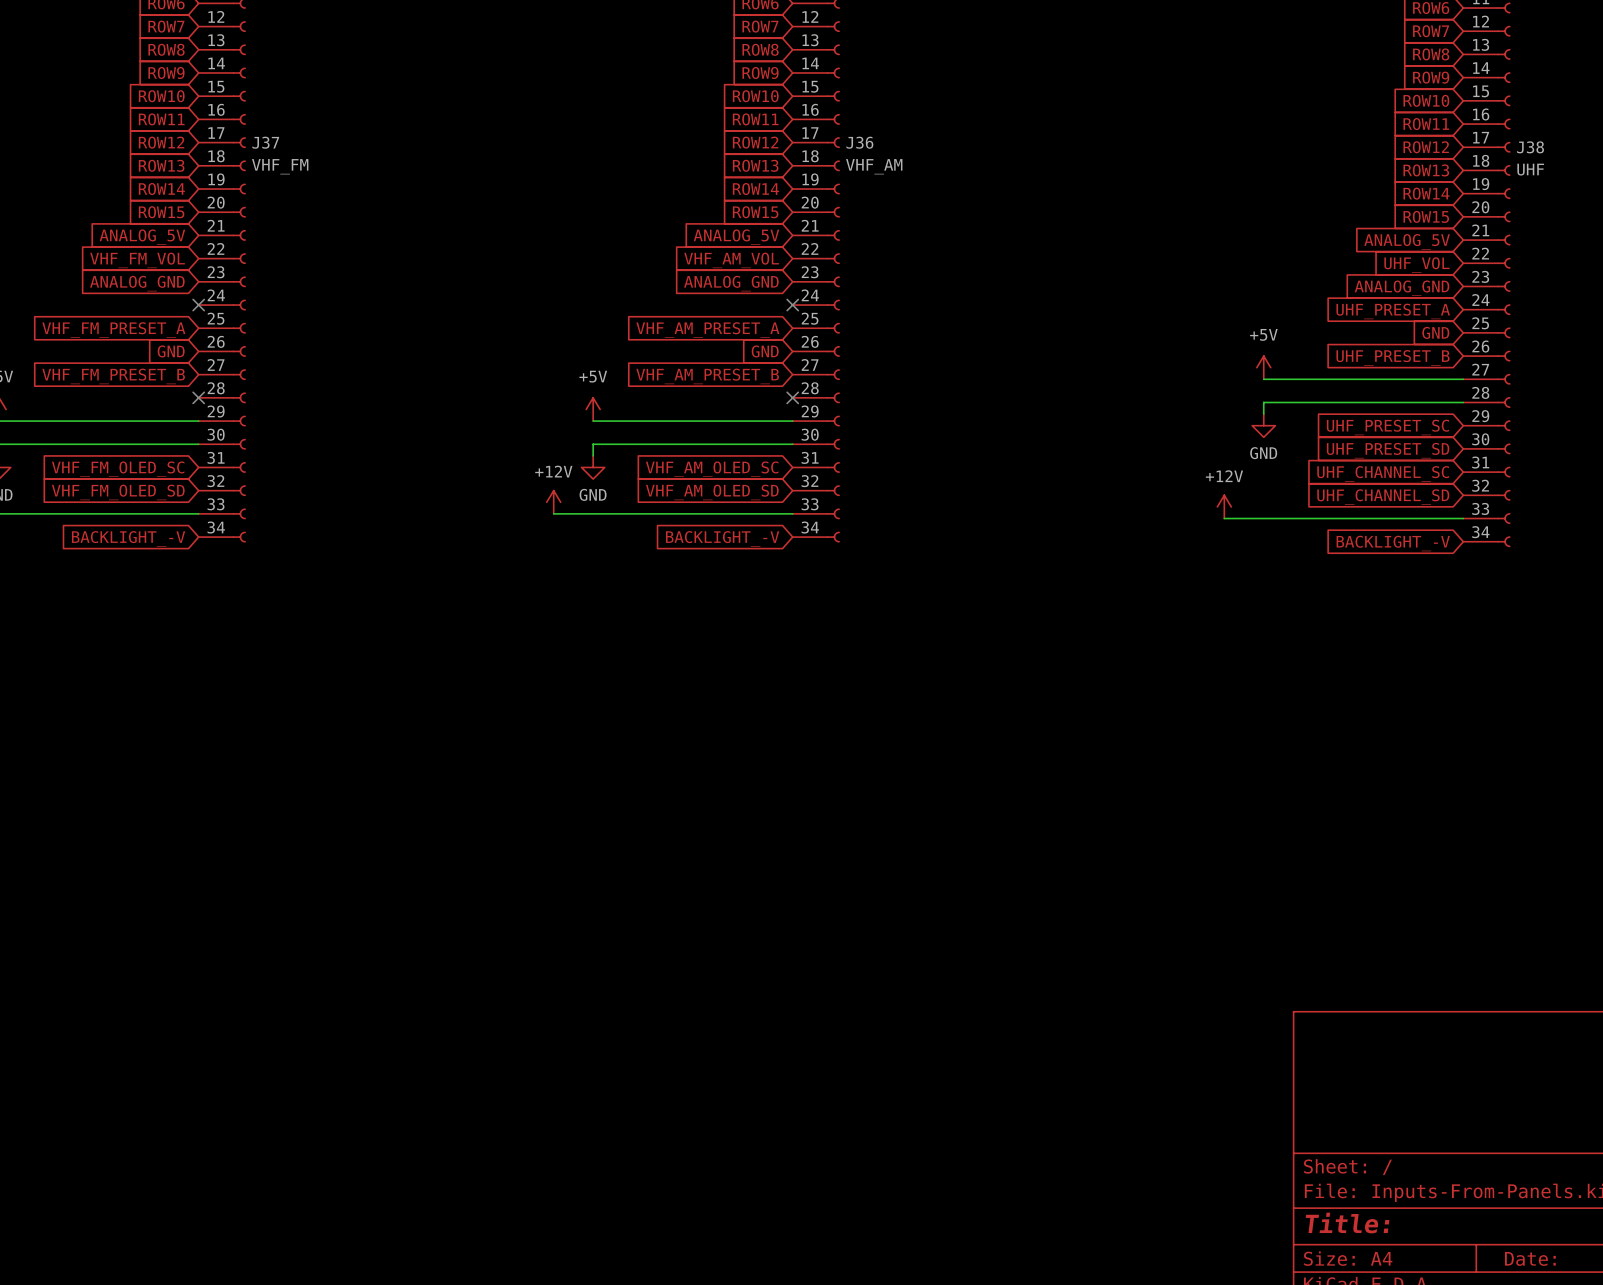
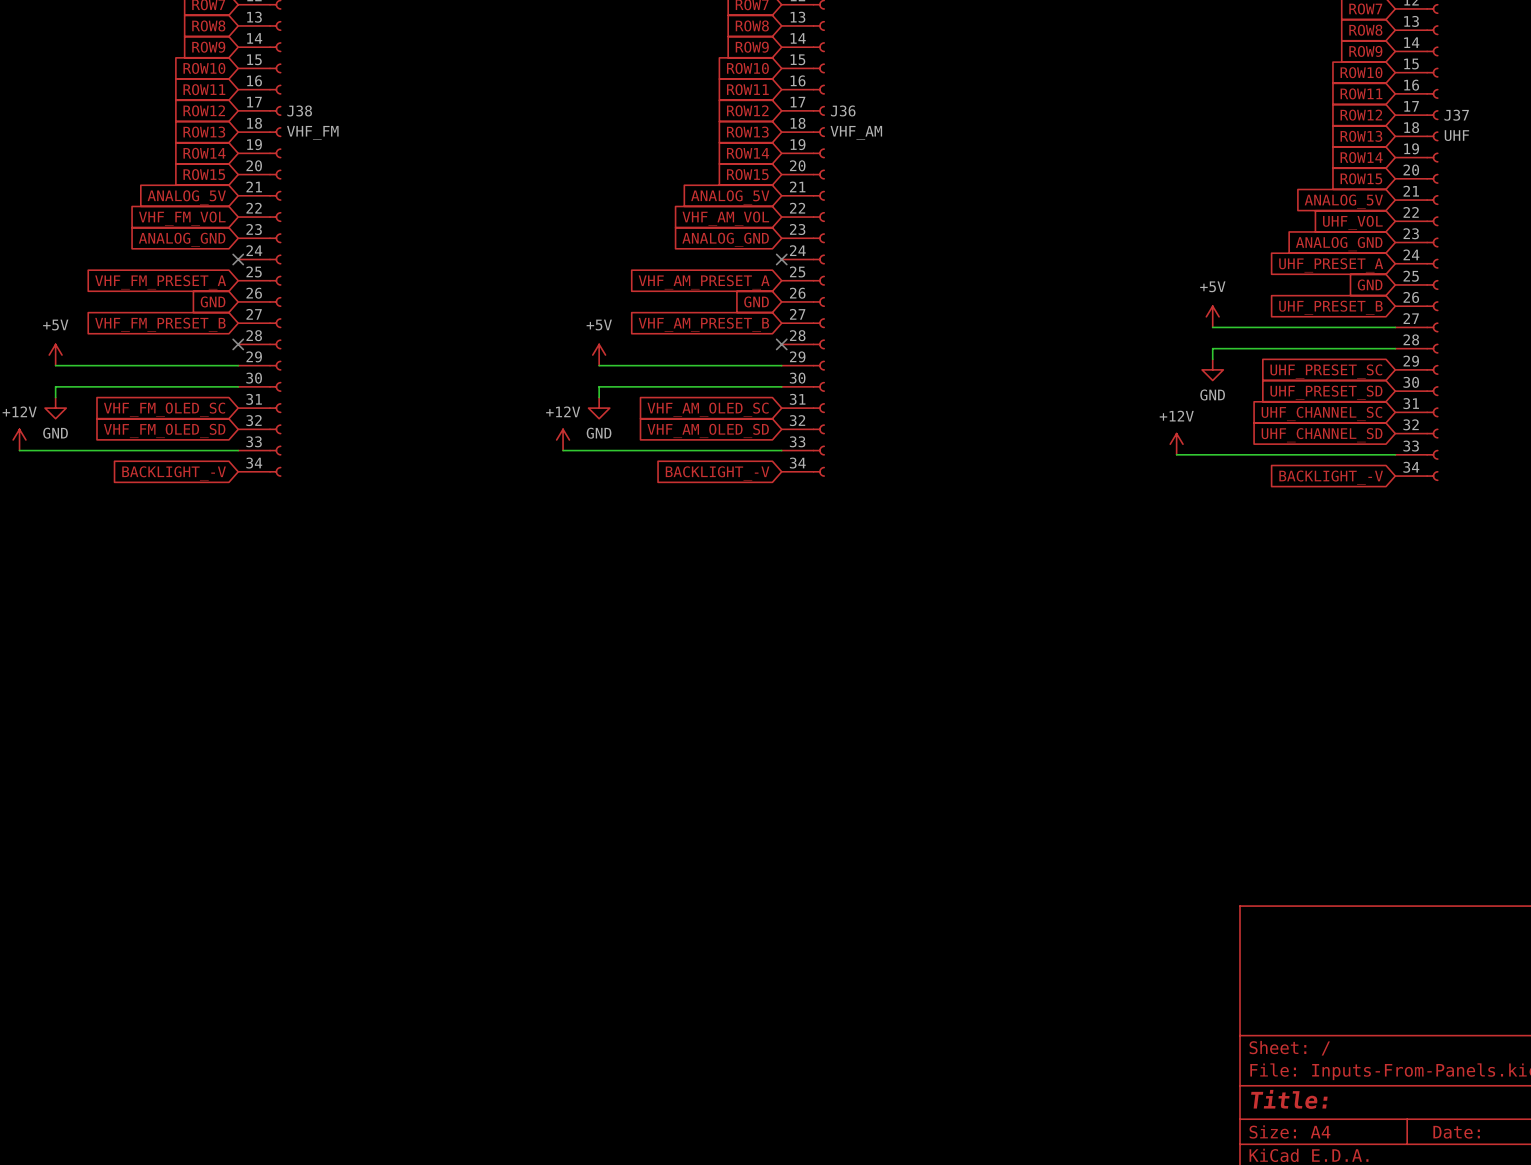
J37 name: J37 (265, 142) -> J38 (299, 110)
J38 name: J38 (1530, 147) -> J37 (1456, 115)

